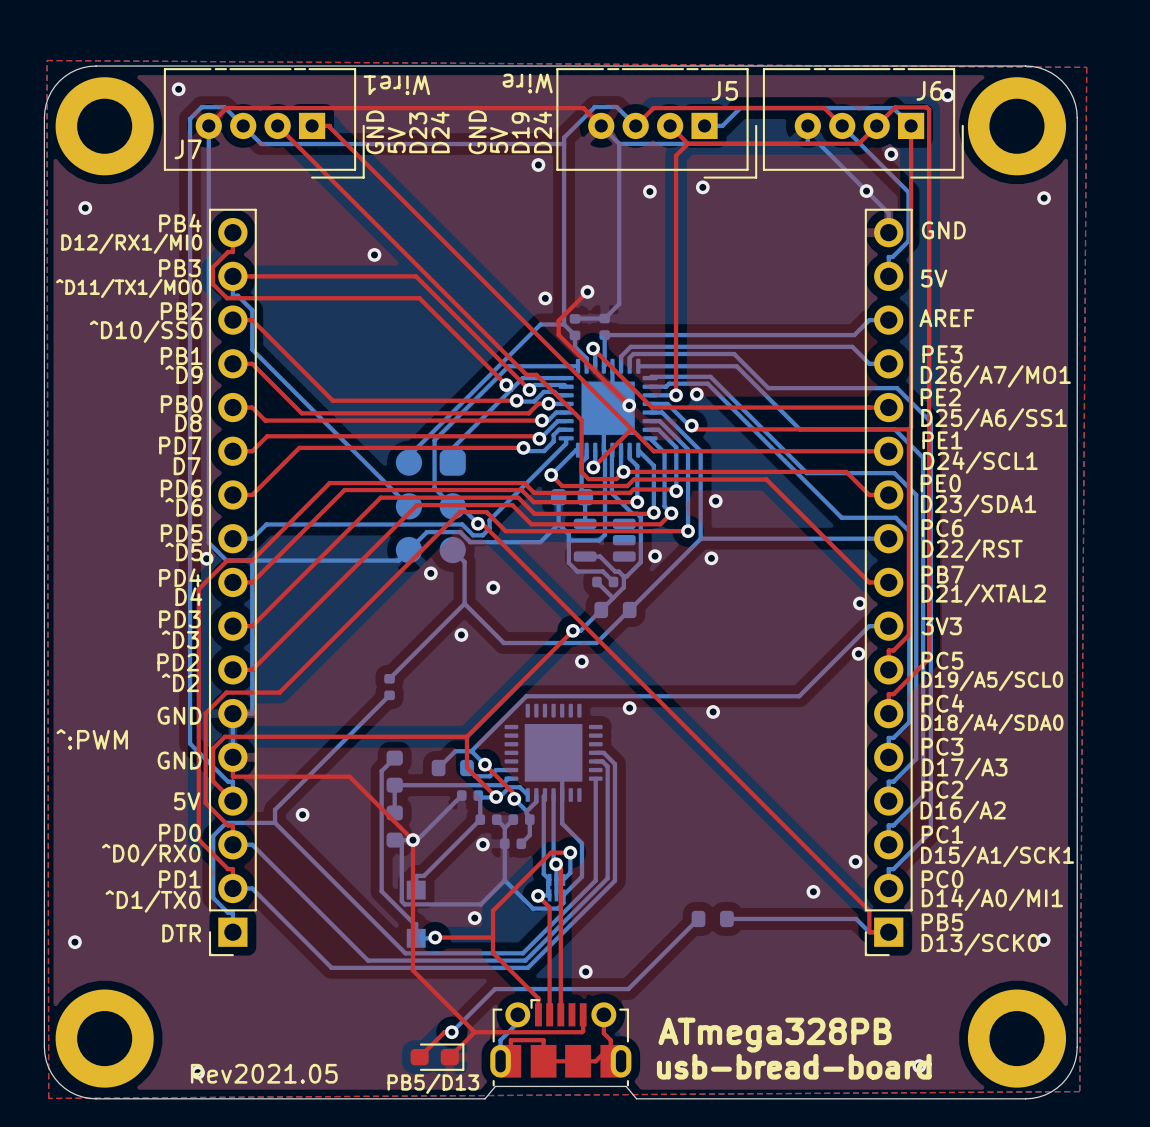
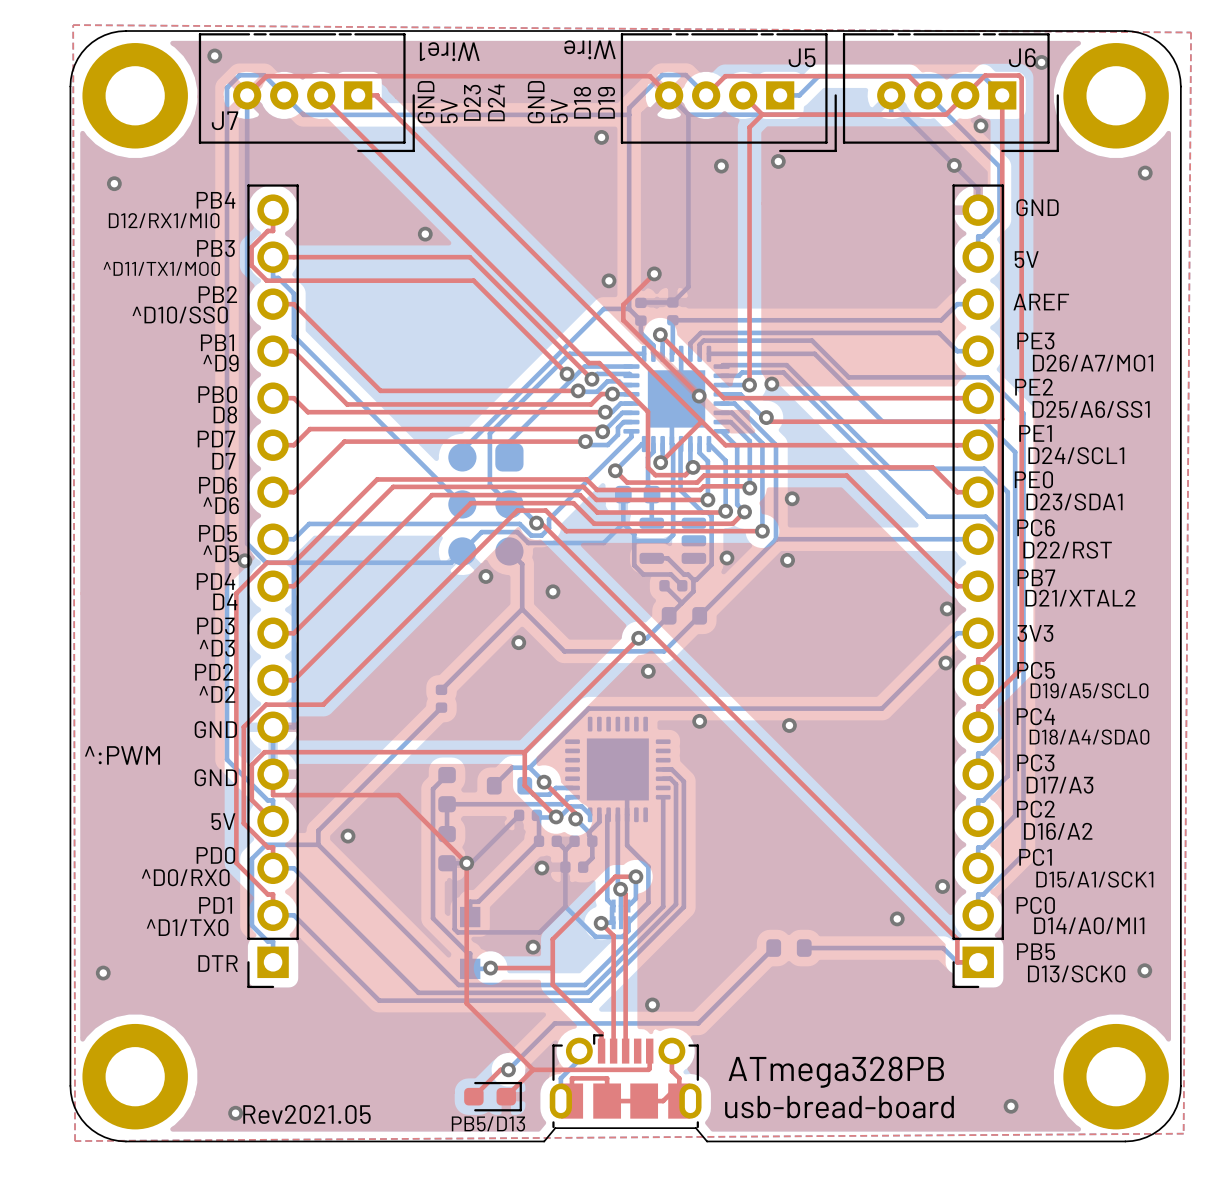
text: D19 (520, 132) -> D18 (582, 102)
text: D24 (542, 132) -> D19 (606, 102)

